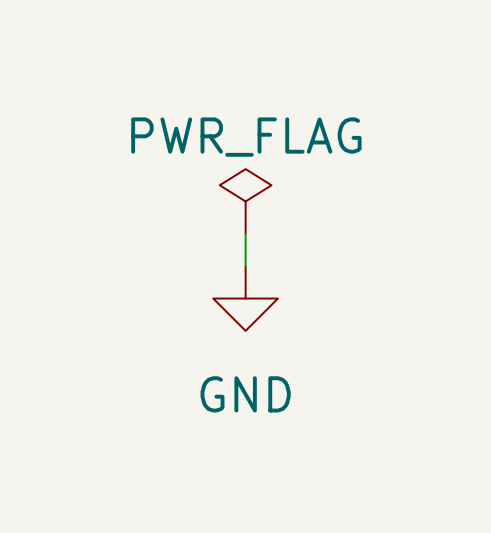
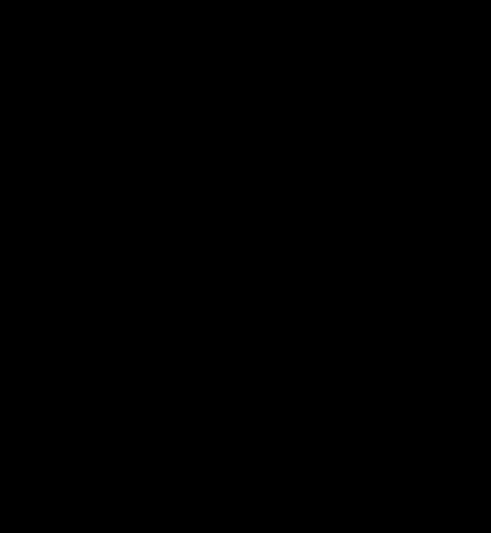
power symbol: PWR_FLAG (245, 201) -> none
wire: (245, 233) (245, 266) -> none
power symbol: GND (245, 298) -> none

